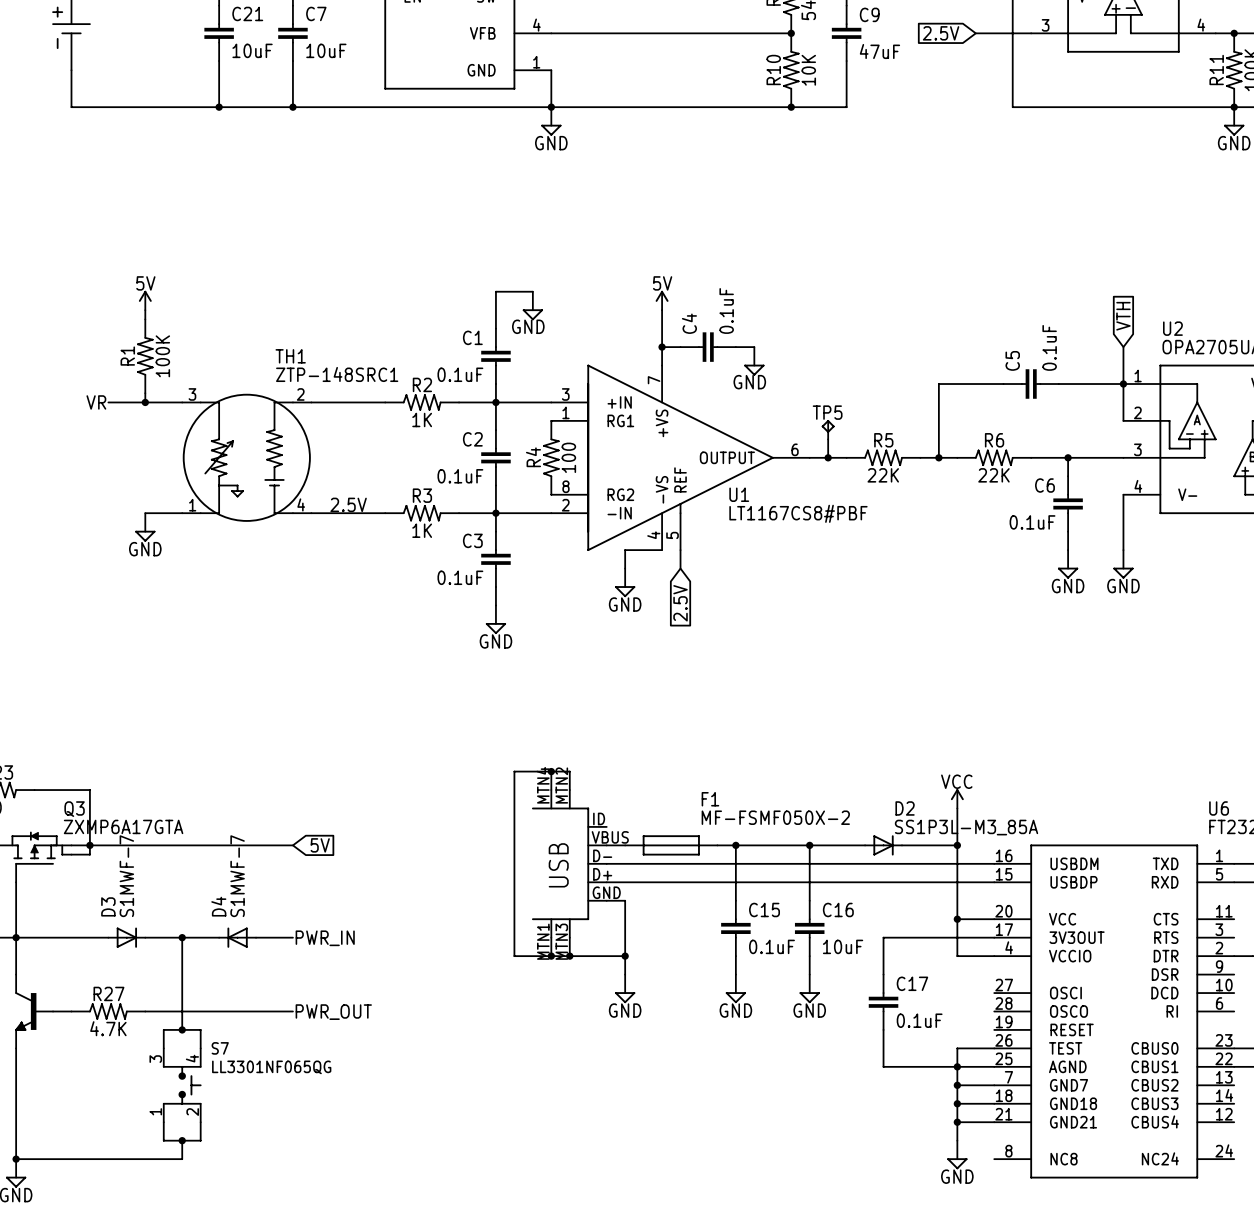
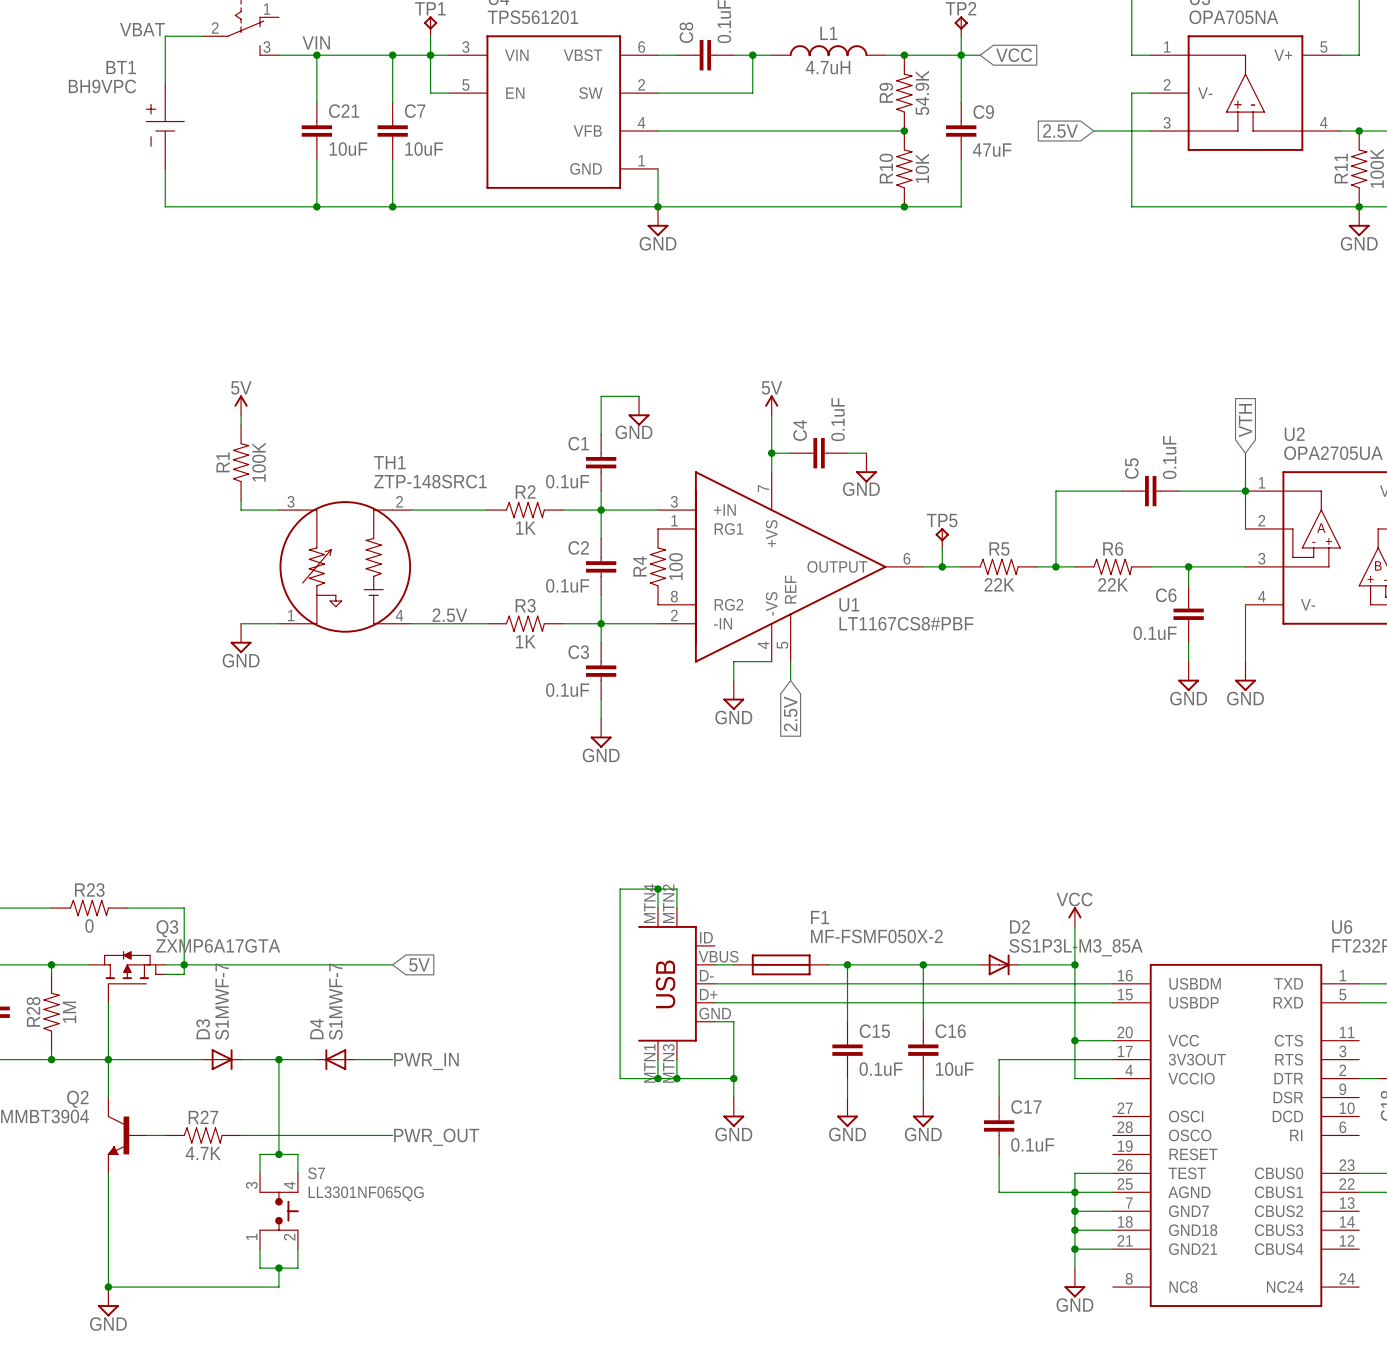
label: VR (96, 402) -> none
wire: (108, 402) (145, 402) -> none
junction: (145, 402) -> none

